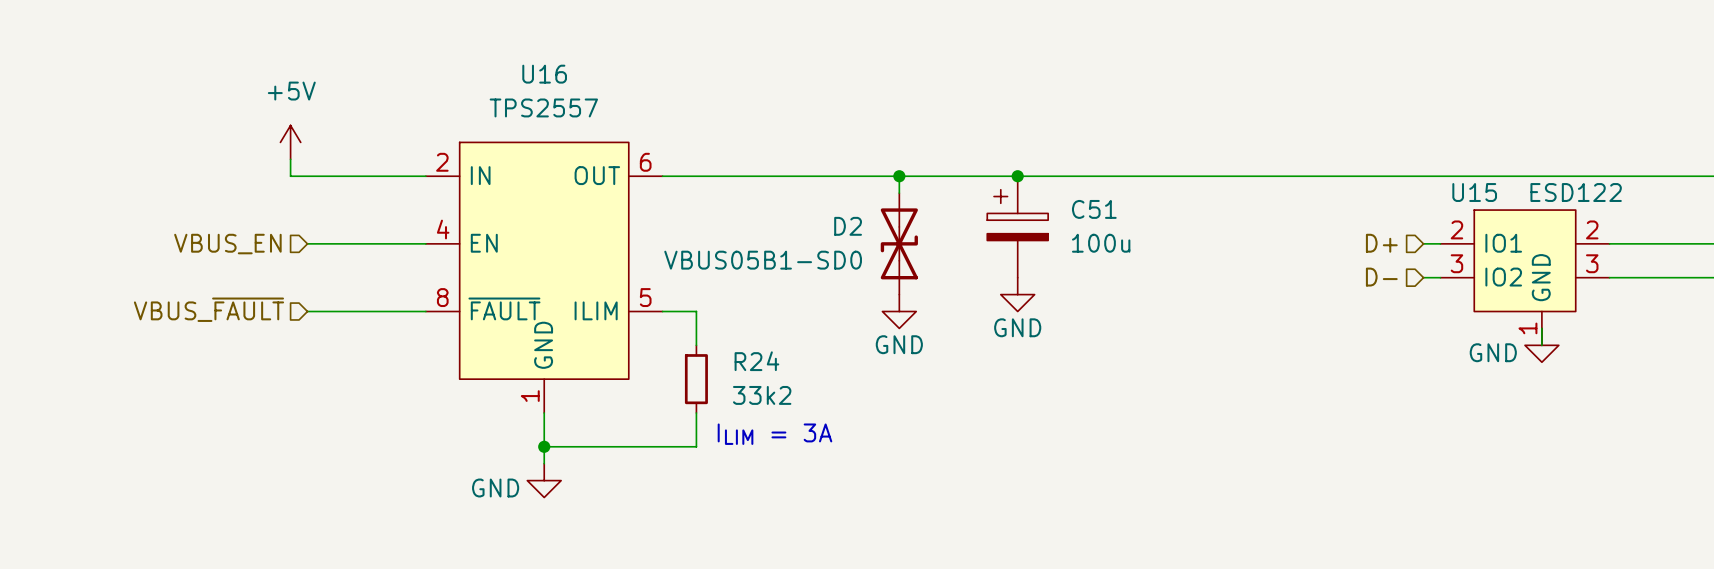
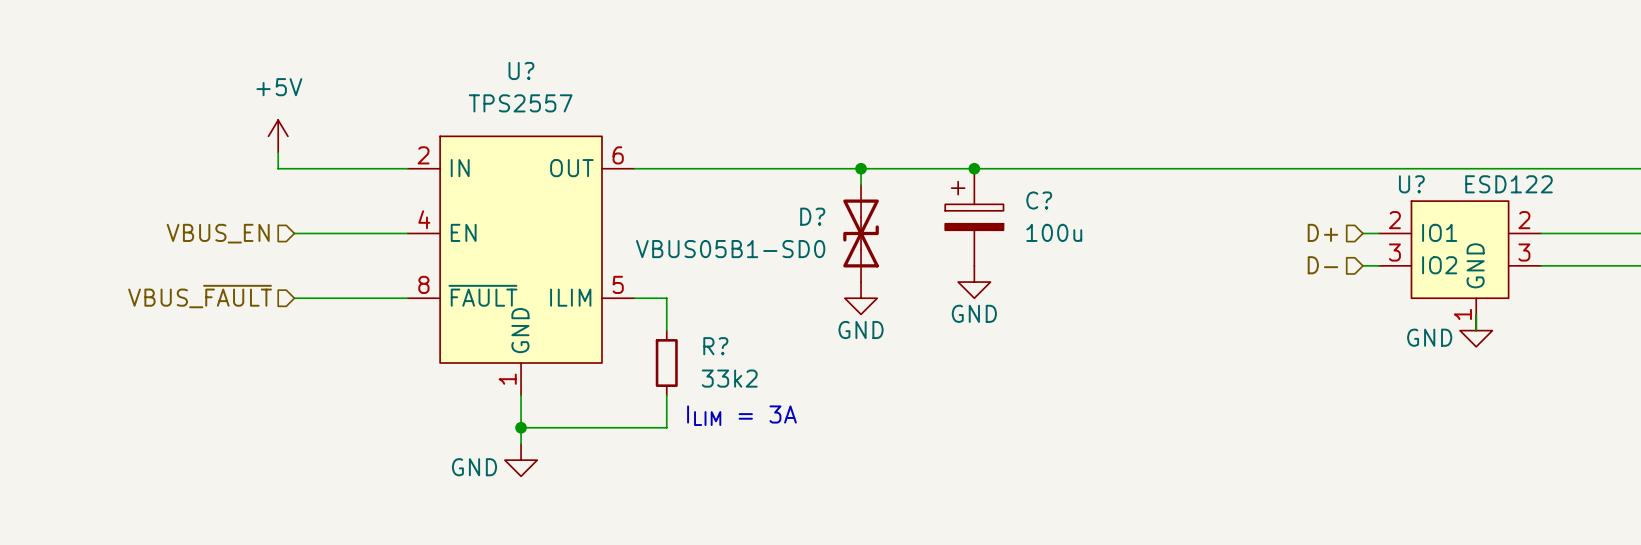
U16 name: U16 (544, 74) -> U? (521, 70)
U15 name: U15 (1474, 192) -> U? (1411, 184)
C51 name: C51 (1094, 209) -> C? (1039, 200)
D2 name: D2 (848, 226) -> D? (812, 216)
R24 name: R24 (756, 361) -> R? (715, 346)

